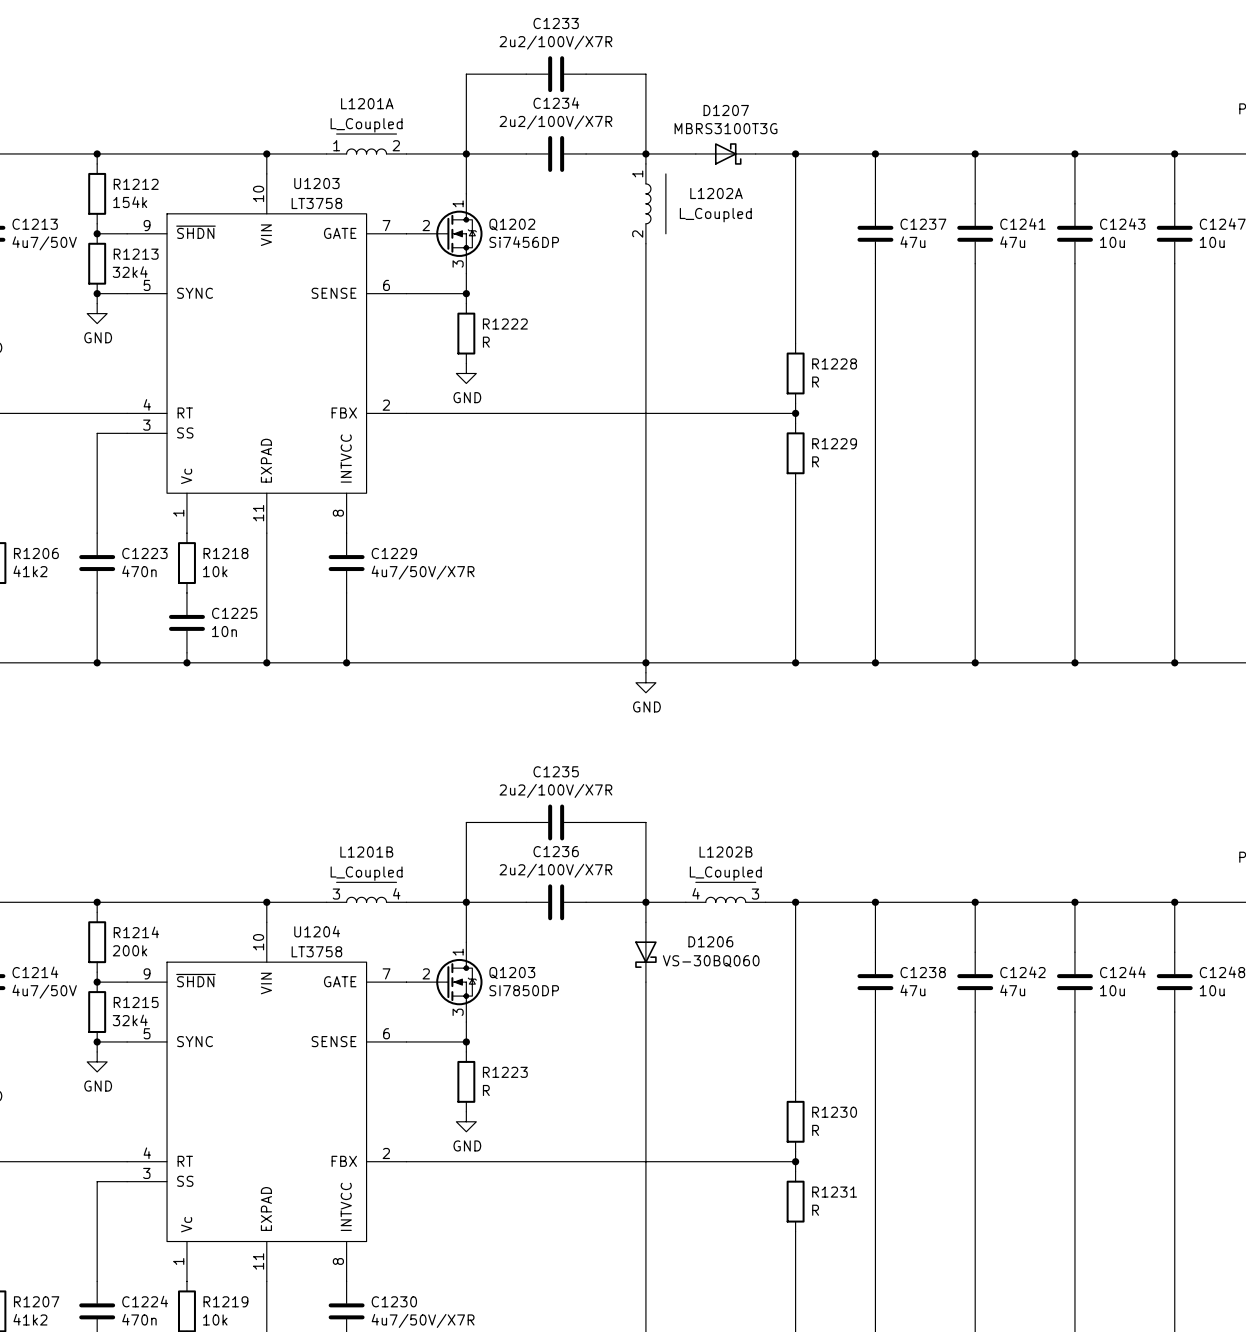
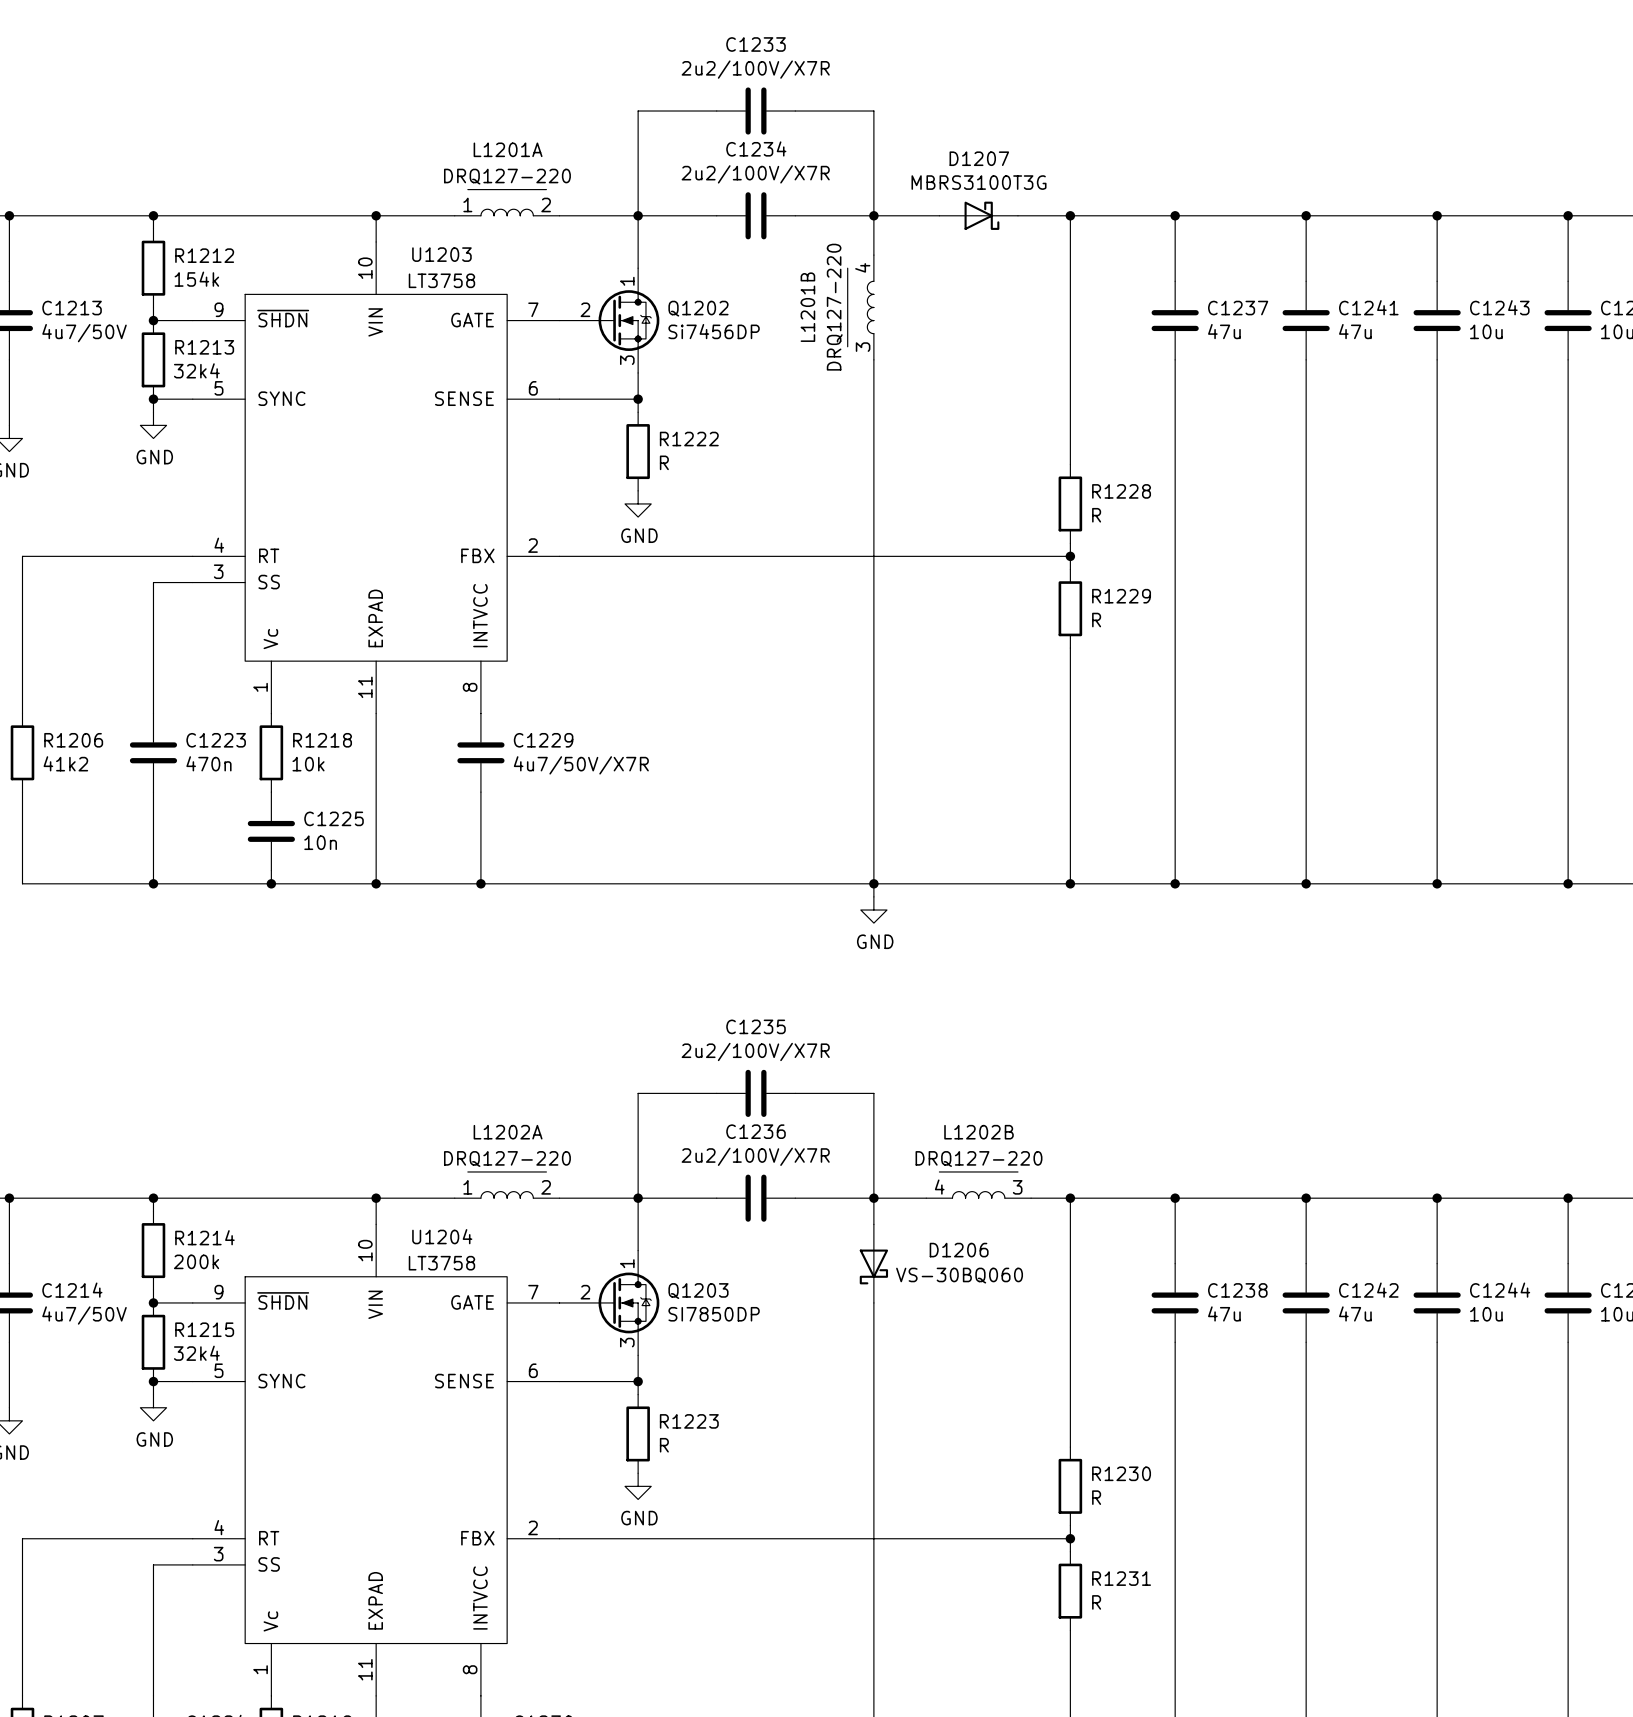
L1201A value: L_Coupled (366, 125) -> DRQ127-220 (507, 176)
L1202A name position: L1202A (716, 193) -> L1202A (508, 1132)
L1202A position: (611, 213) -> (520, 1244)
L1202A value: L_Coupled (715, 215) -> DRQ127-220 (507, 1159)
L1202A rotation: 0° (611, 218) -> 90° counterclockwise (526, 1244)
L1201B value: L_Coupled (366, 873) -> DRQ127-220 (834, 307)
L1202B value: L_Coupled (725, 873) -> DRQ127-220 (979, 1159)
L1201B position: (376, 937) -> (919, 294)
L1201B rotation: 0° (381, 937) -> 90° counterclockwise (919, 287)

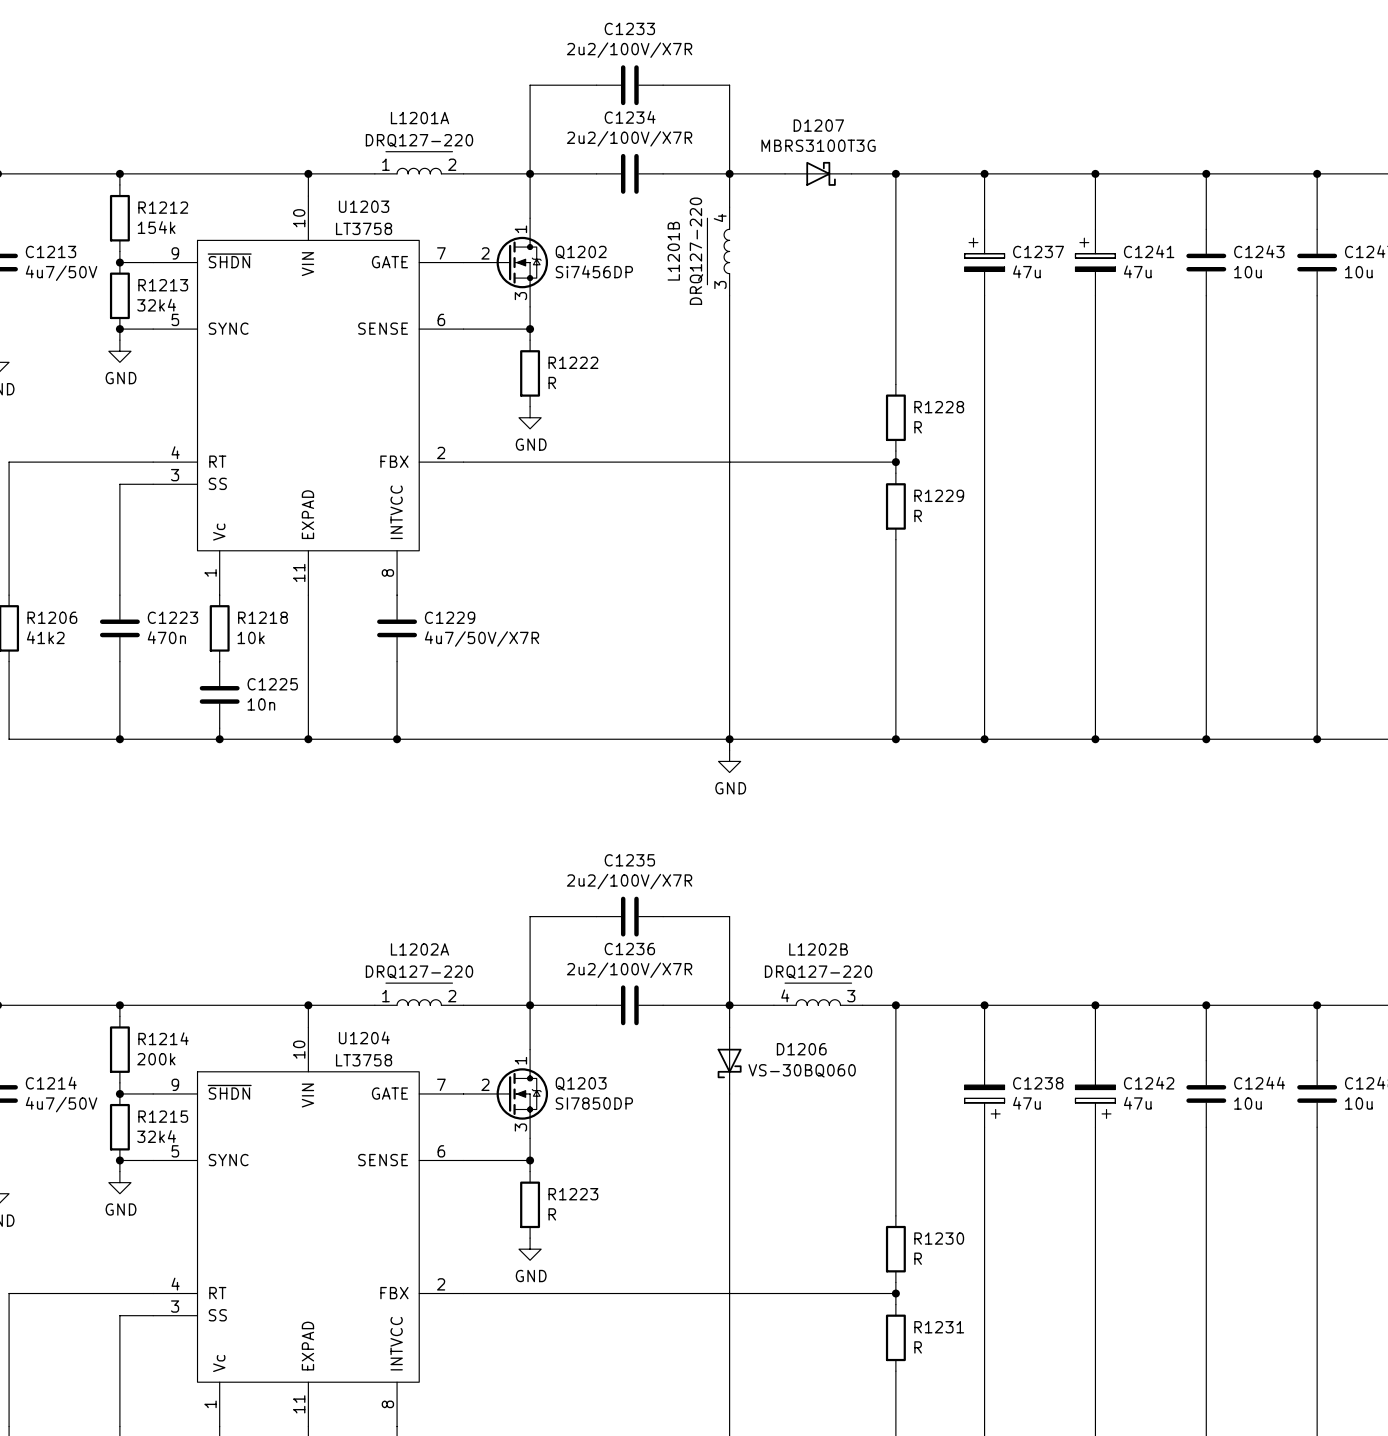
C1237 symbol: [1151, 281, 1199, 360] -> [964, 229, 1005, 296]
C1241 symbol: [1282, 281, 1330, 360] -> [1075, 229, 1116, 296]
C1238 symbol: [1151, 1263, 1199, 1343] -> [964, 1060, 1005, 1128]
C1242 symbol: [1282, 1263, 1330, 1343] -> [1075, 1060, 1116, 1128]

